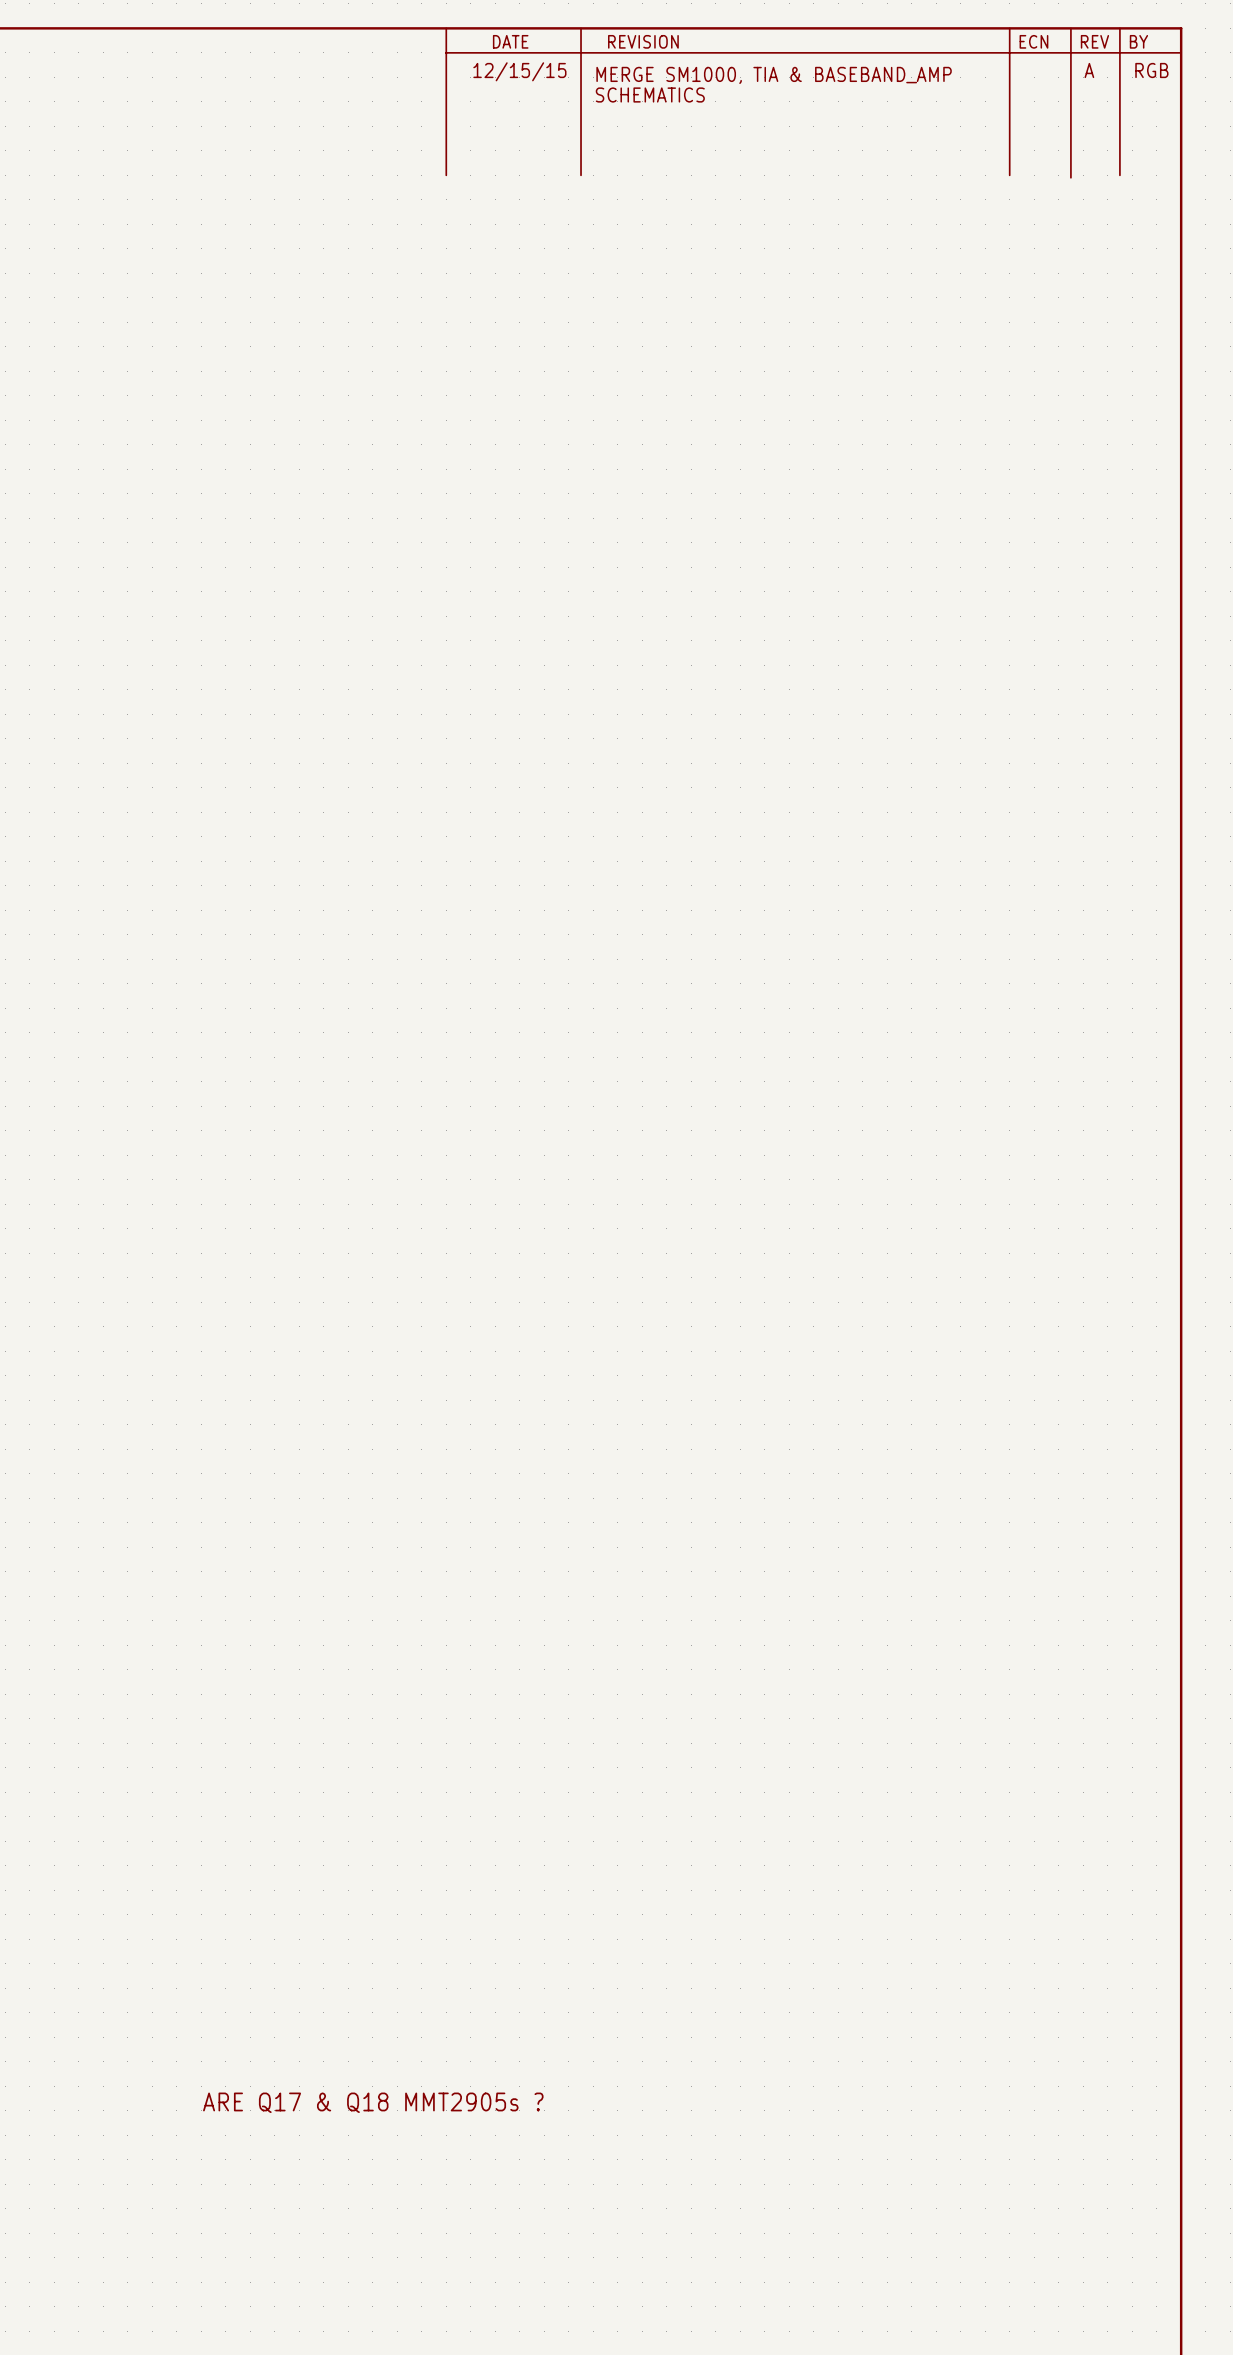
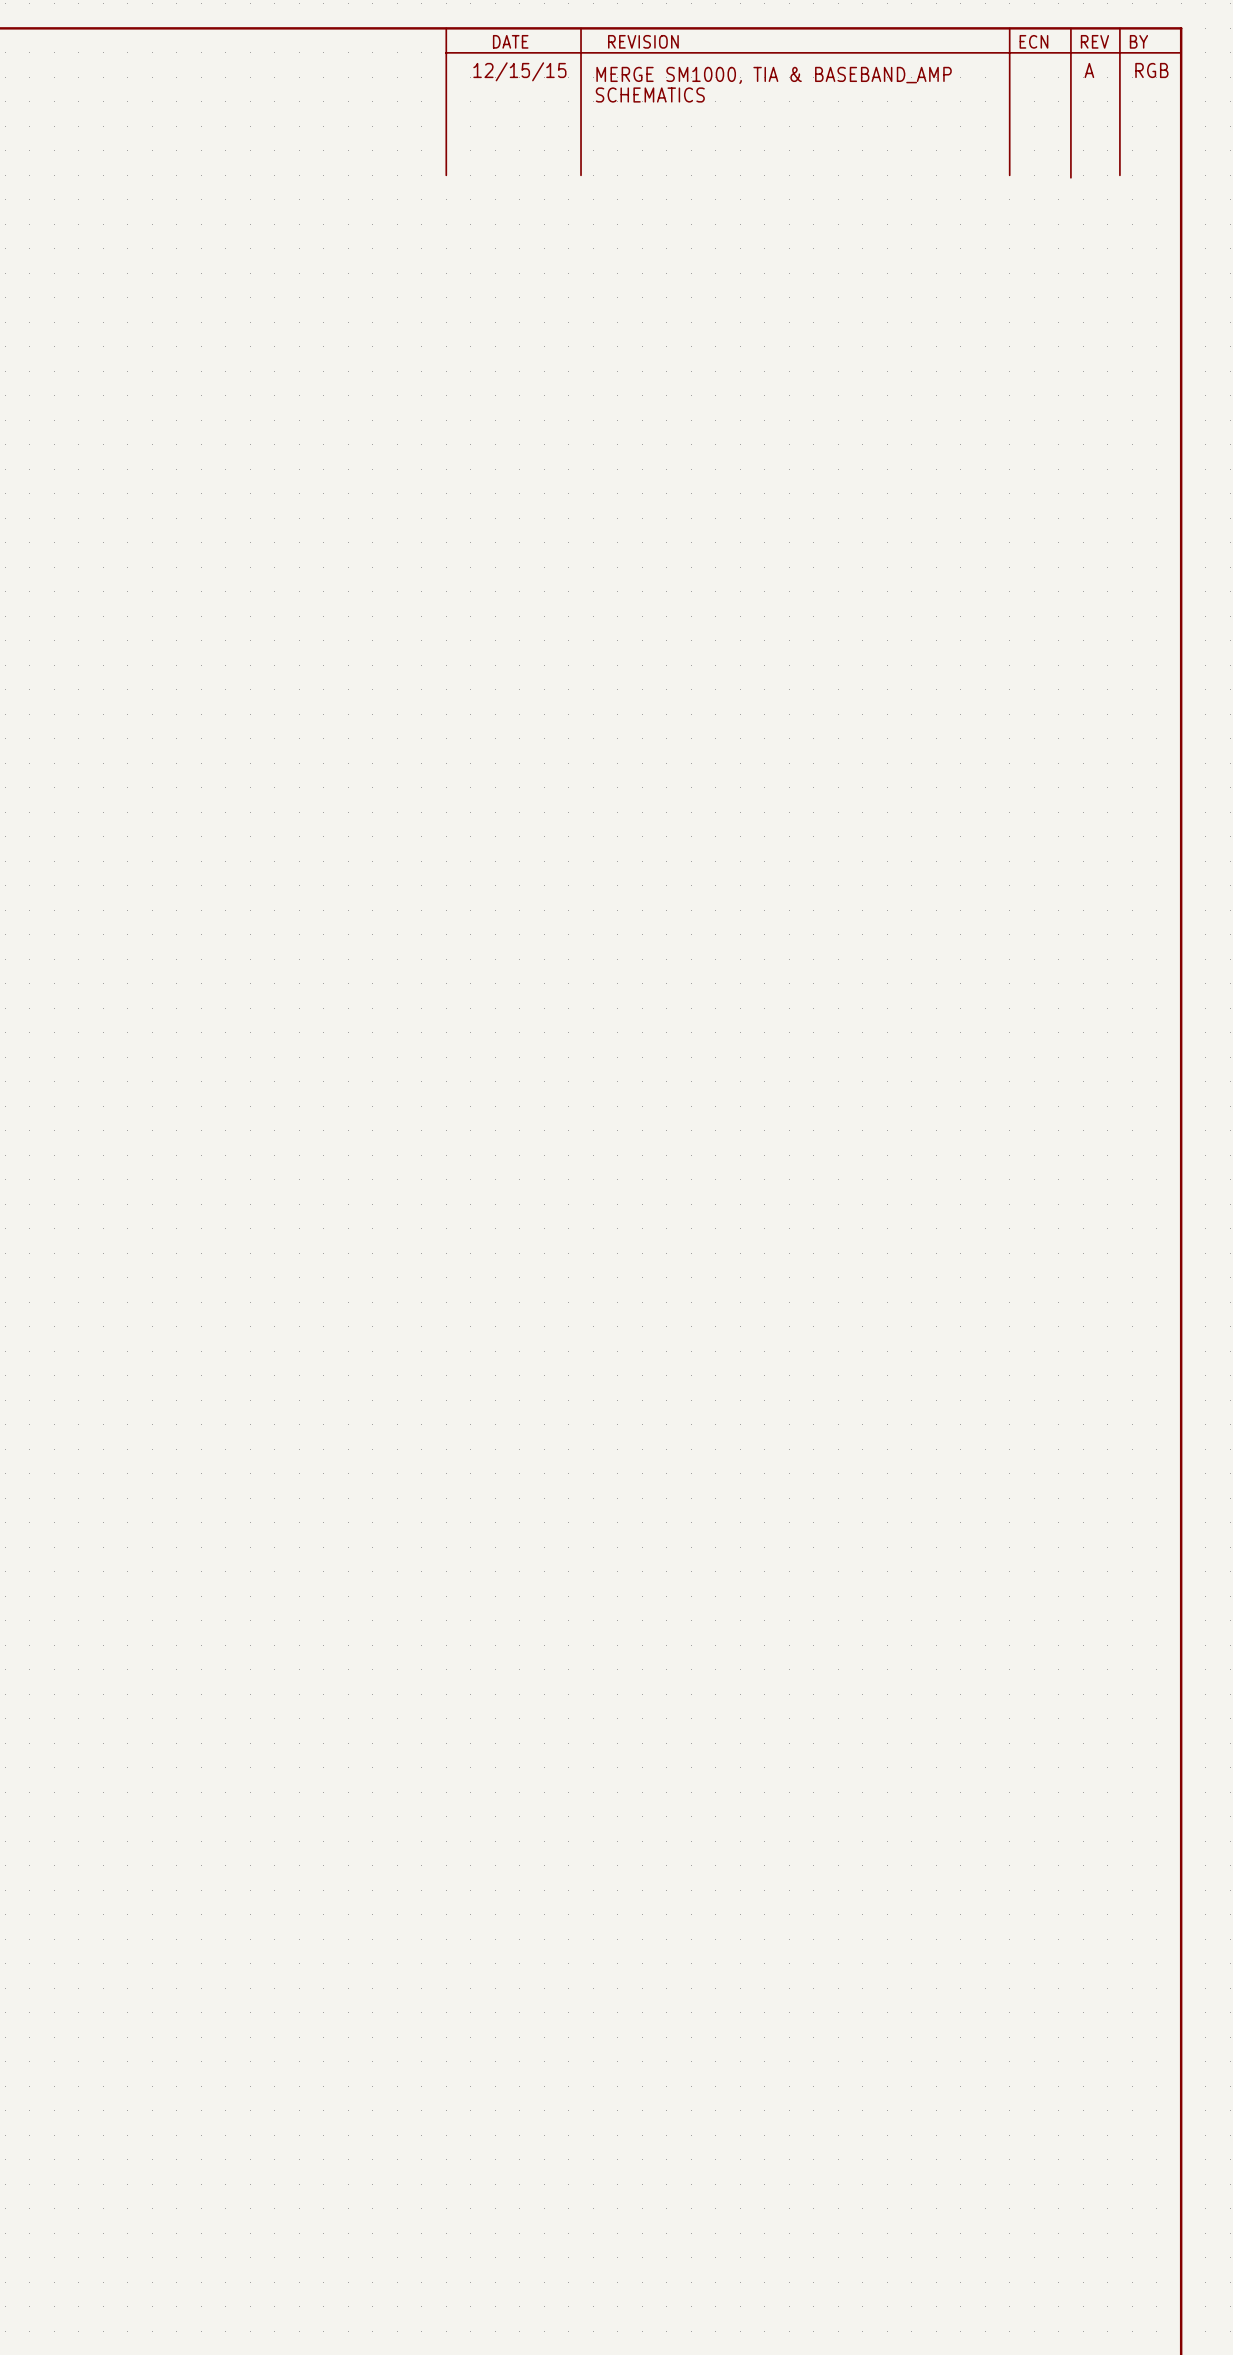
text: ARE Q17 & Q18 MMT2905s ? (373, 2102) -> none

